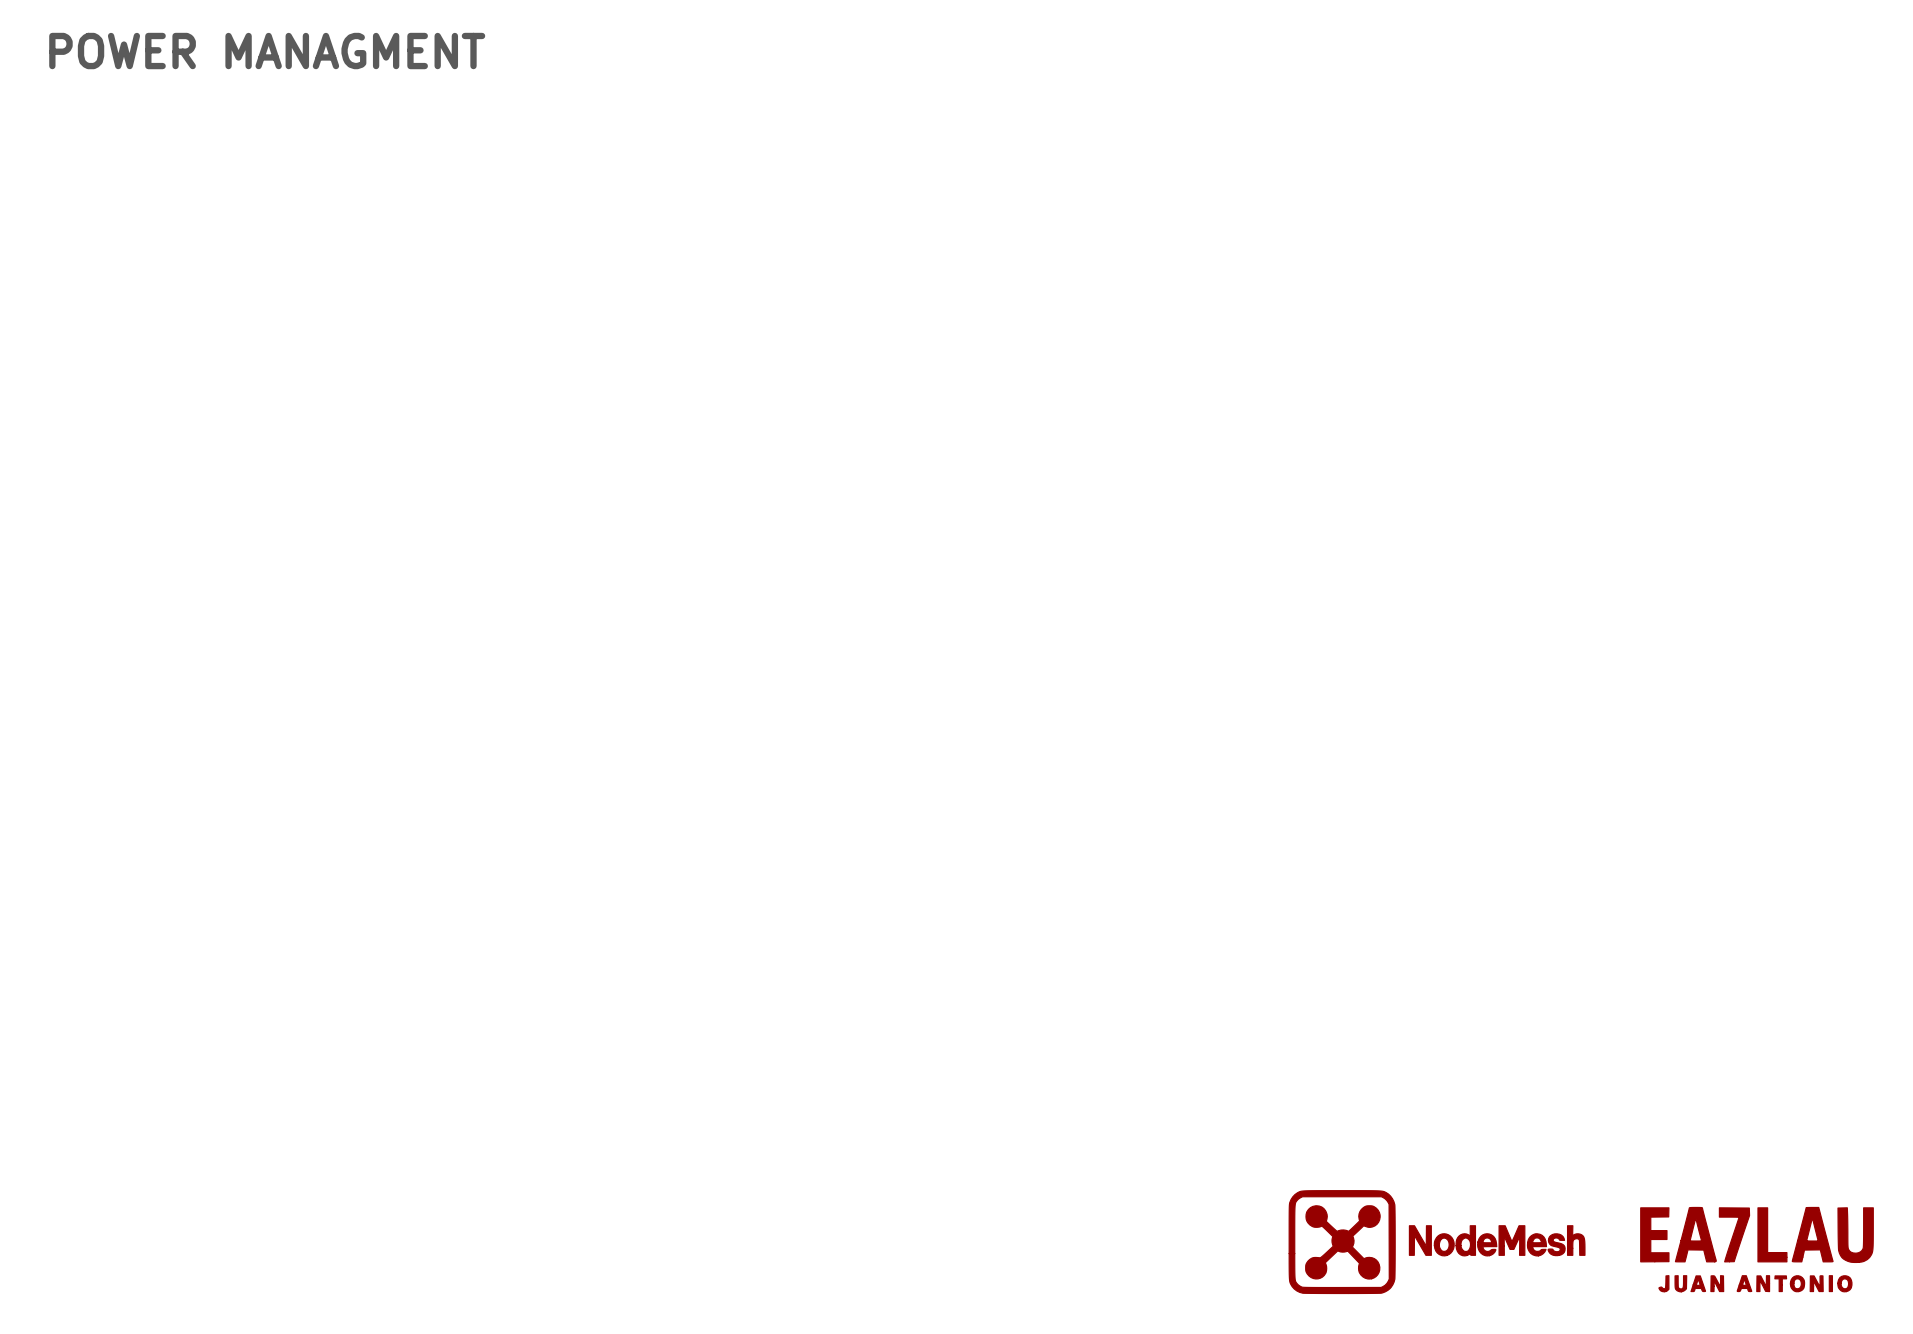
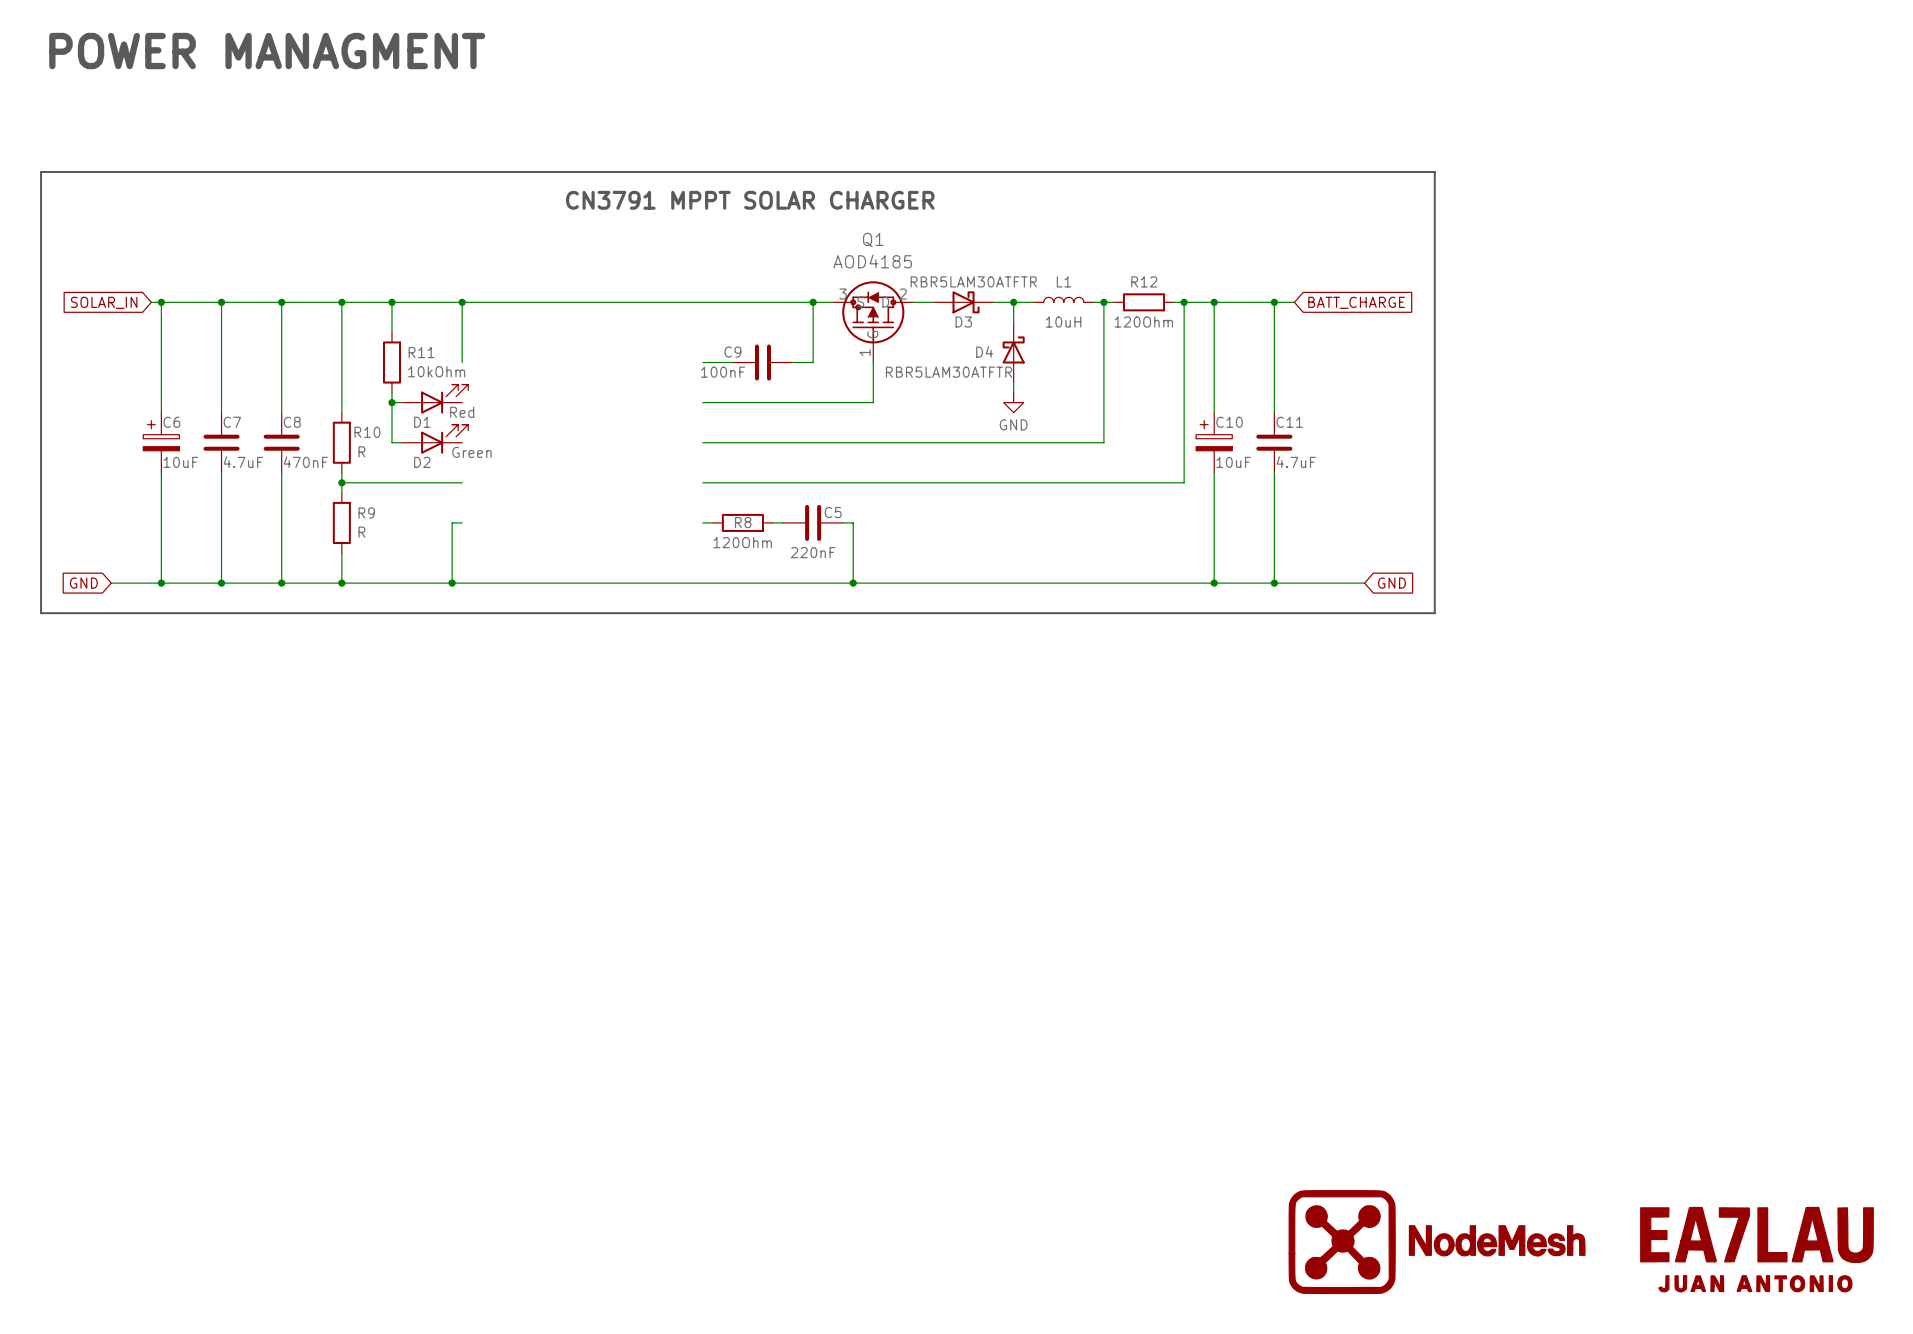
line: none -> (41, 171) (1434, 171) (1434, 613) (41, 613) (41, 171)
text: none -> CN3791 MPPT SOLAR CHARGER (750, 200)
L1: none -> 10uH (1063, 299)
global label: none -> SOLAR_IN (104, 302)
wire: none -> (151, 302) (833, 302)
wire: none -> (161, 302) (161, 412)
junction: none -> (161, 302)
wire: none -> (221, 302) (221, 412)
junction: none -> (221, 302)
wire: none -> (281, 302) (281, 412)
junction: none -> (281, 302)
wire: none -> (341, 302) (341, 412)
junction: none -> (341, 302)
wire: none -> (391, 302) (391, 332)
junction: none -> (391, 302)
wire: none -> (462, 302) (462, 362)
junction: none -> (462, 302)
wire: none -> (813, 302) (813, 362) (793, 362)
junction: none -> (813, 302)
wire: none -> (913, 302) (933, 302)
D3: none -> RBR5LAM30ATFTR (963, 302)
wire: none -> (993, 302) (1033, 302)
wire: none -> (1013, 302) (1013, 322)
junction: none -> (1013, 302)
wire: none -> (1093, 302) (1113, 302)
wire: none -> (1103, 302) (1103, 442) (702, 442)
junction: none -> (1103, 302)
R12: none -> 120Ohm (1144, 302)
wire: none -> (1174, 302) (1294, 302)
wire: none -> (1184, 302) (1184, 482) (702, 482)
junction: none -> (1184, 302)
wire: none -> (1214, 302) (1214, 412)
junction: none -> (1214, 302)
wire: none -> (1274, 302) (1274, 412)
junction: none -> (1274, 302)
global label: none -> BATT_CHARGE (1356, 302)
Q1: none -> AOD4185 (873, 321)
D4: none -> RBR5LAM30ATFTR (1013, 352)
R11: none -> 10kOhm (391, 362)
wire: none -> (702, 362) (732, 362)
C9: none -> 100nF (762, 362)
wire: none -> (873, 362) (873, 402) (702, 402)
wire: none -> (1013, 382) (1013, 392)
wire: none -> (391, 392) (391, 442) (402, 442)
D1: none -> Red (435, 399)
wire: none -> (391, 402) (402, 402)
junction: none -> (391, 402)
power symbol: none -> GND (1013, 402)
D2: none -> Green (435, 439)
C6: none -> 10uF (161, 442)
C7: none -> 4.7uF (221, 442)
C8: none -> 470nF (281, 442)
R10: none -> R (341, 442)
C10: none -> 10uF (1214, 442)
C11: none -> 4.7uF (1274, 442)
wire: none -> (161, 472) (161, 583)
wire: none -> (221, 472) (221, 583)
wire: none -> (281, 472) (281, 583)
wire: none -> (341, 472) (341, 492)
wire: none -> (1214, 472) (1214, 583)
wire: none -> (1274, 472) (1274, 583)
wire: none -> (341, 482) (462, 482)
junction: none -> (341, 482)
R9: none -> R (341, 522)
wire: none -> (462, 522) (452, 522) (452, 583)
wire: none -> (702, 522) (712, 522)
R8: none -> 120Ohm (742, 522)
wire: none -> (773, 522) (783, 522)
C5: none -> 220nF (813, 522)
wire: none -> (843, 522) (853, 522) (853, 583)
wire: none -> (341, 553) (341, 583)
global label: none -> GND (83, 583)
wire: none -> (111, 583) (1364, 583)
junction: none -> (161, 583)
junction: none -> (221, 583)
junction: none -> (281, 583)
junction: none -> (341, 583)
junction: none -> (452, 583)
junction: none -> (853, 583)
junction: none -> (1214, 583)
junction: none -> (1274, 583)
global label: none -> GND (1391, 583)

